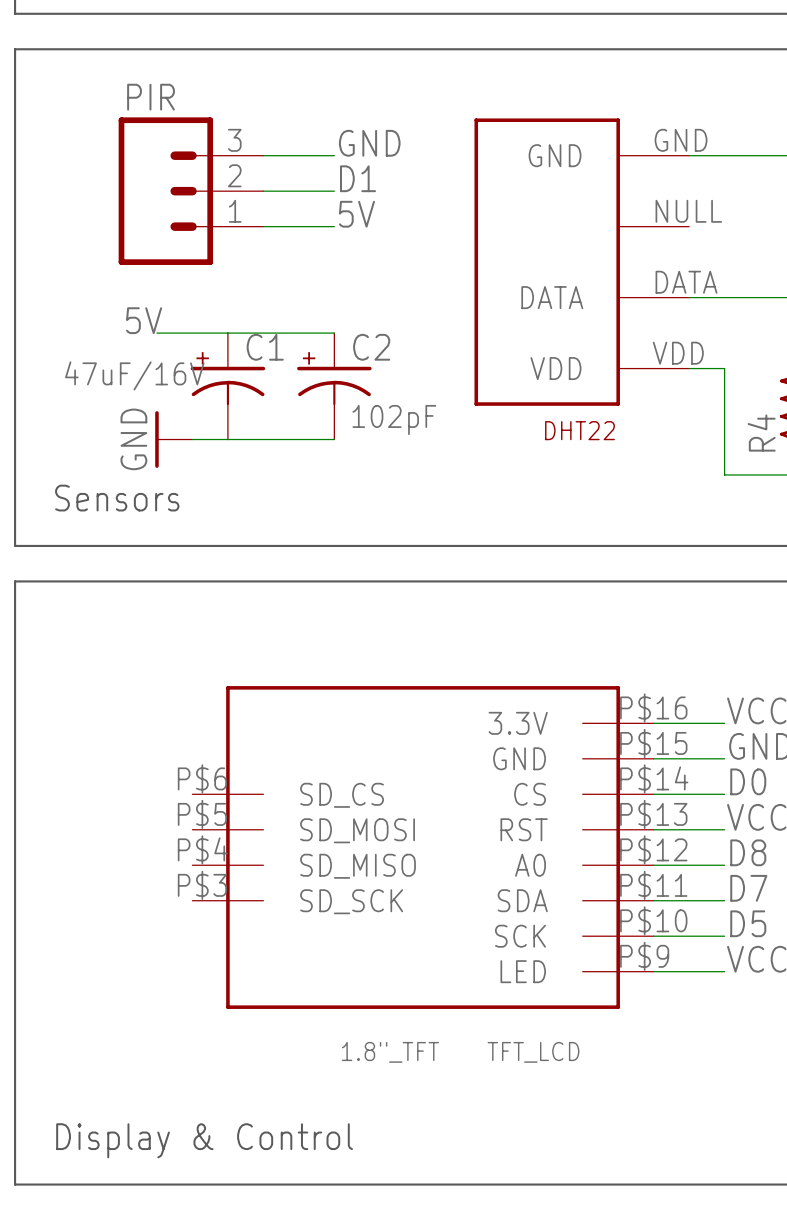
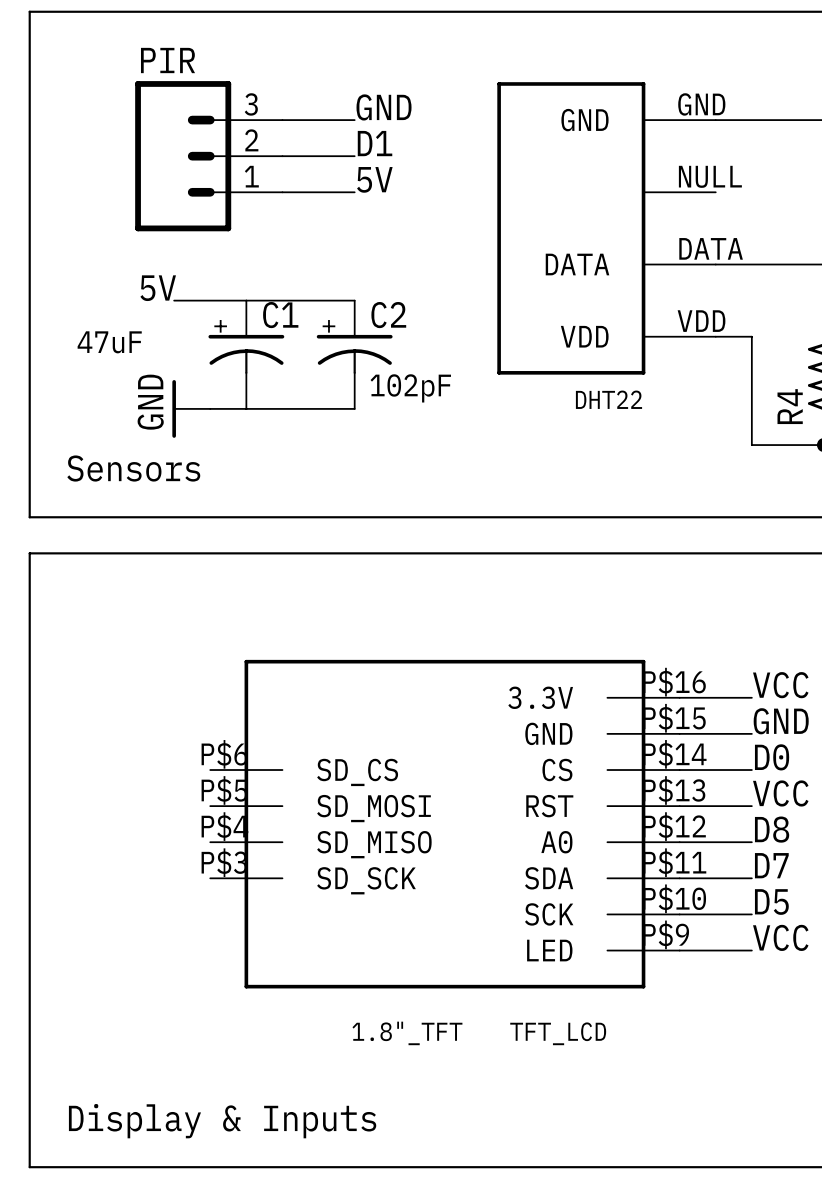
C1 value: 47uF/16V (134, 375) -> 47uF (109, 342)
text: Display & Control (204, 1140) -> Display & Inputs (222, 1121)

